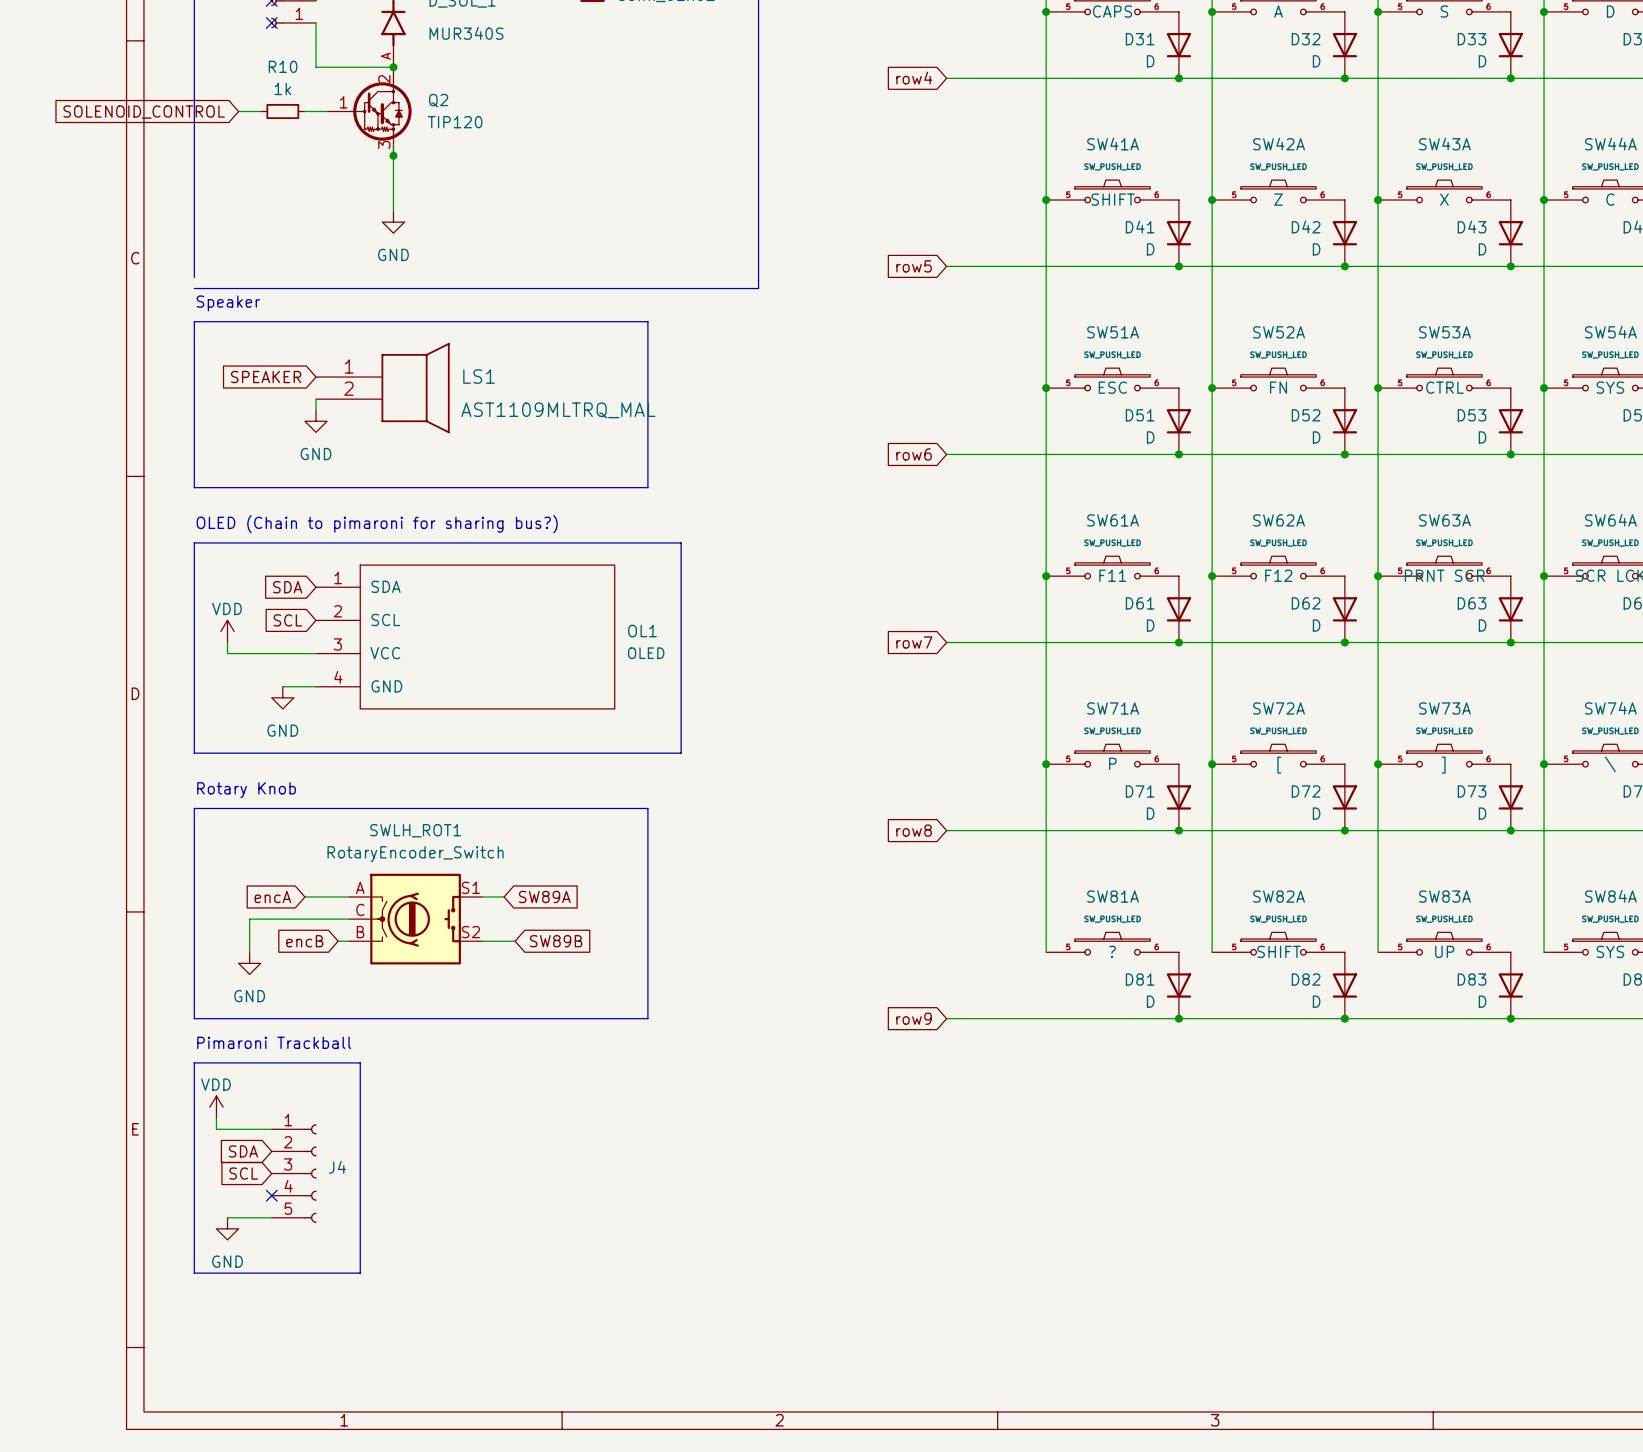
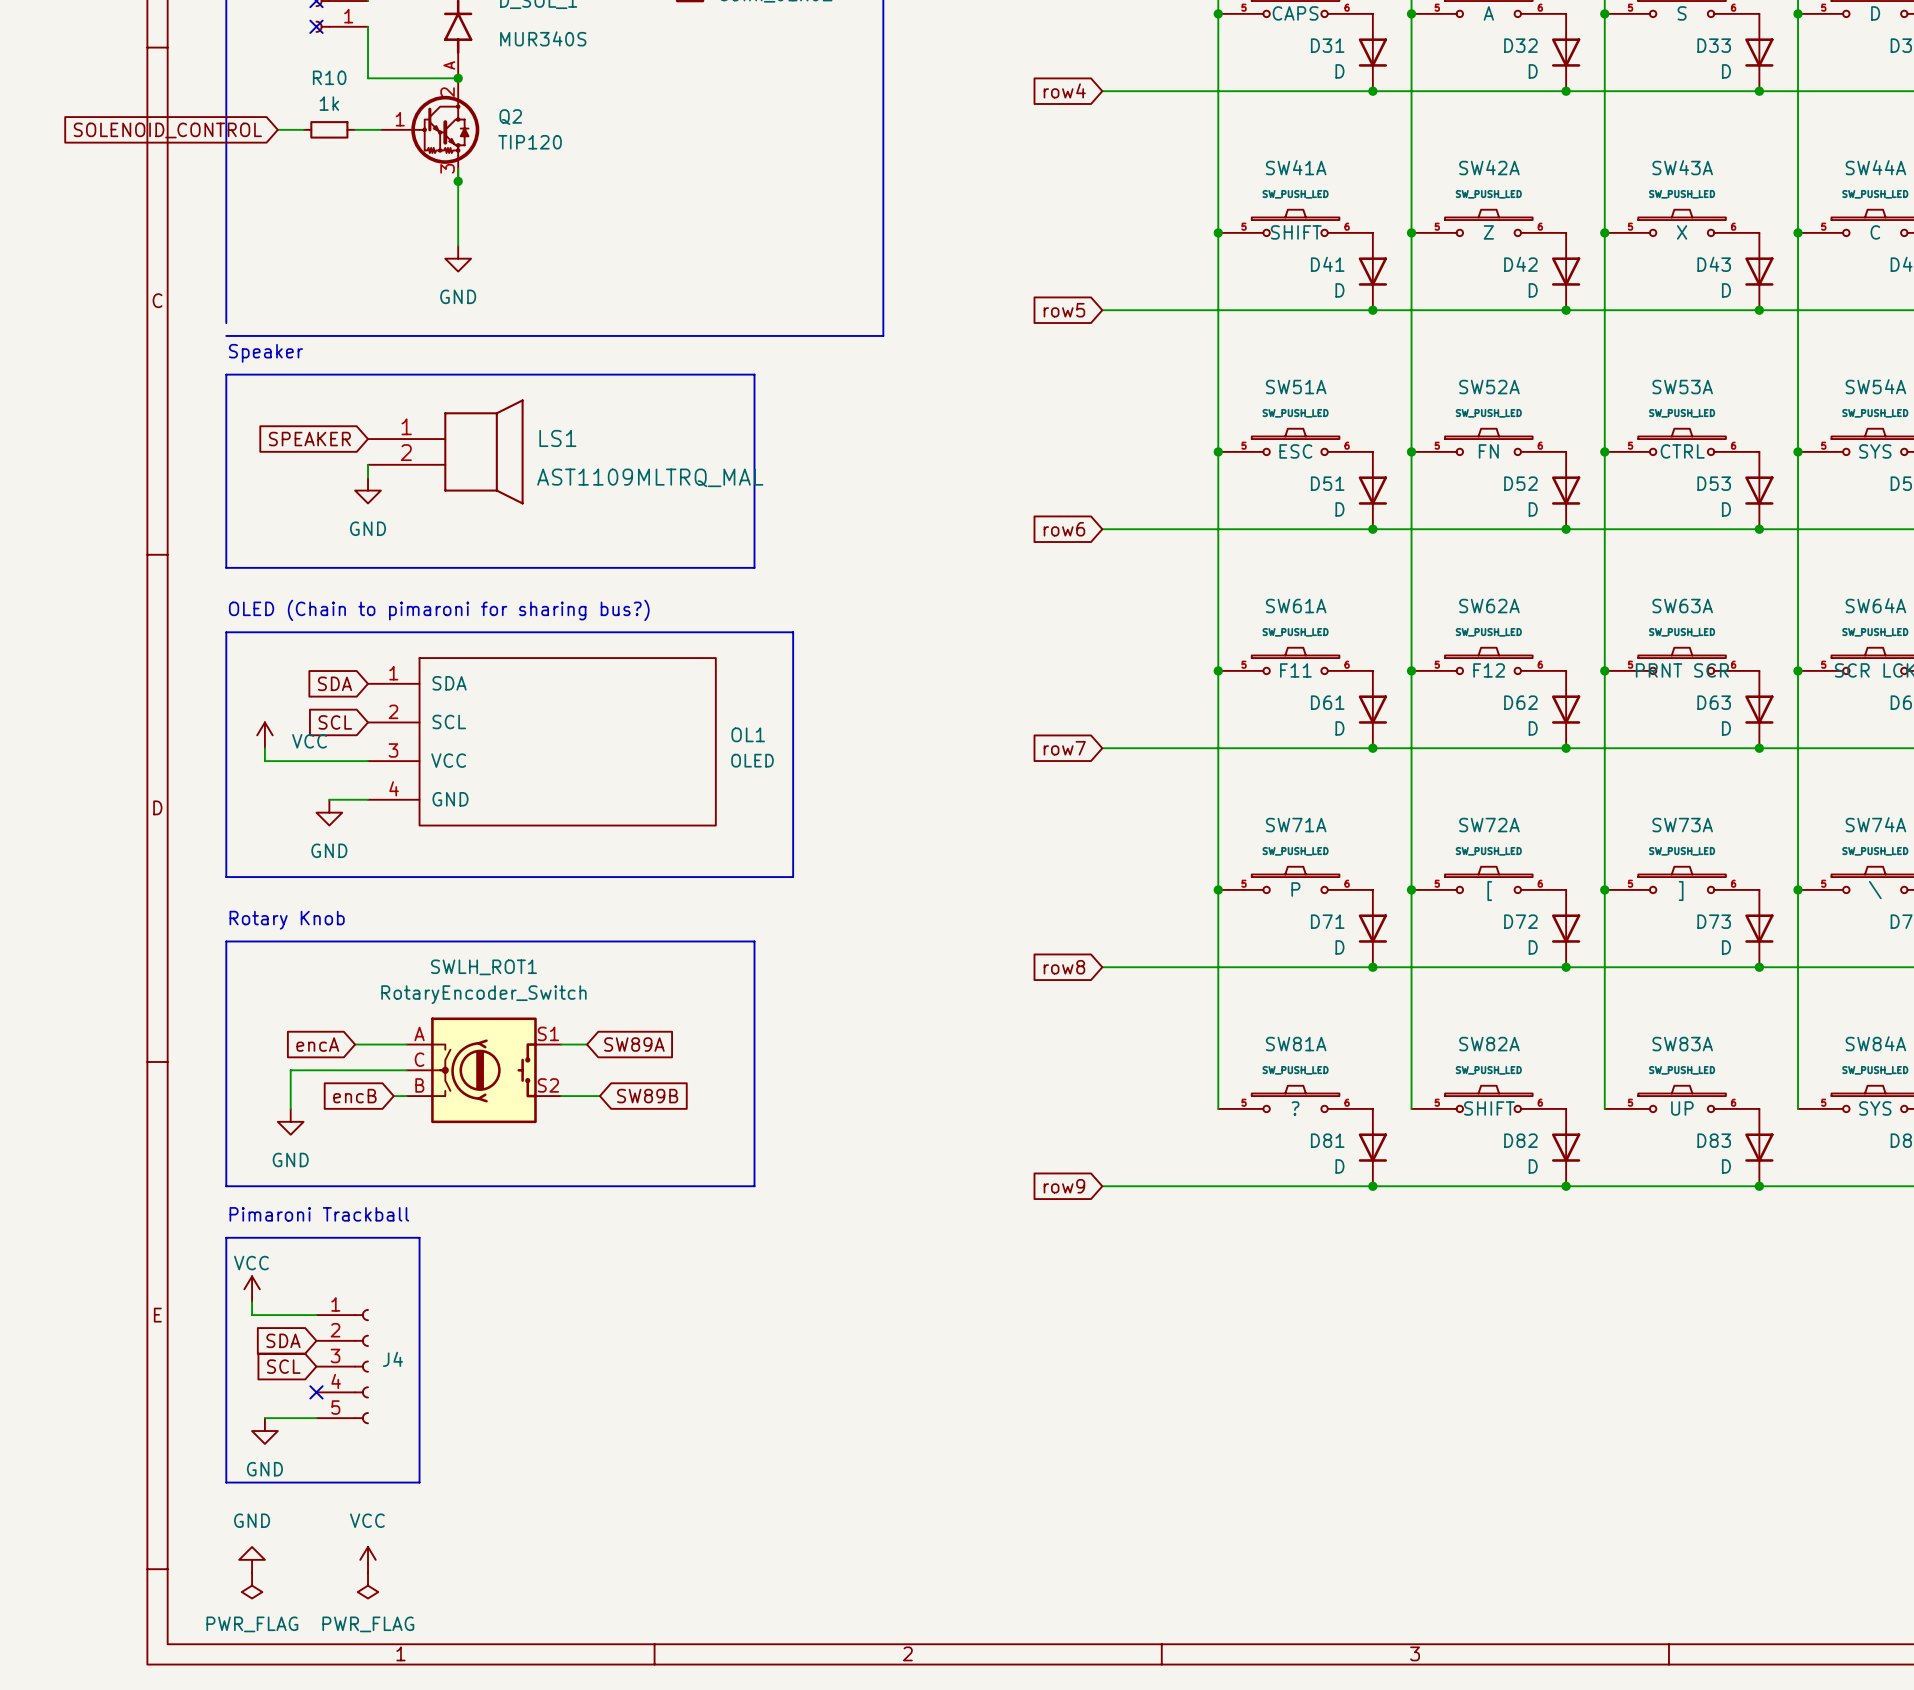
power symbol: VDD (227, 631) -> VCC (264, 735)
power symbol: VDD (216, 1107) -> VCC (252, 1289)
power symbol: none -> GND (252, 1559)
power symbol: none -> VCC (368, 1559)
power symbol: none -> PWR_FLAG (252, 1585)
power symbol: none -> PWR_FLAG (368, 1585)

